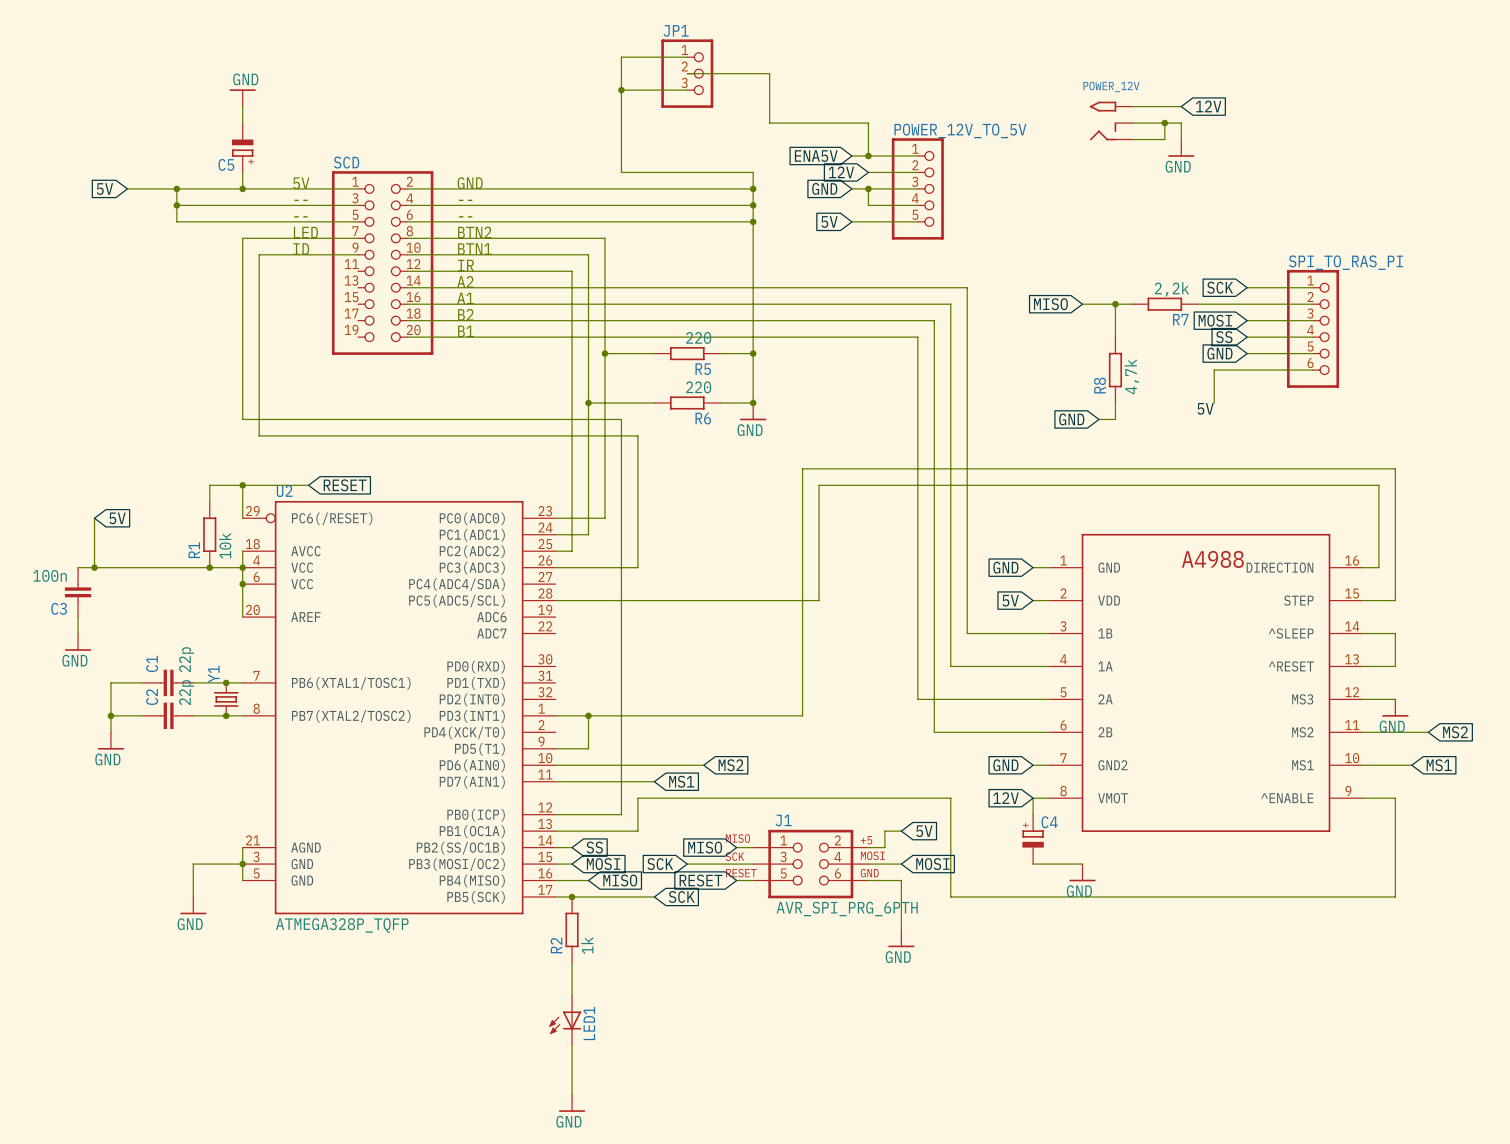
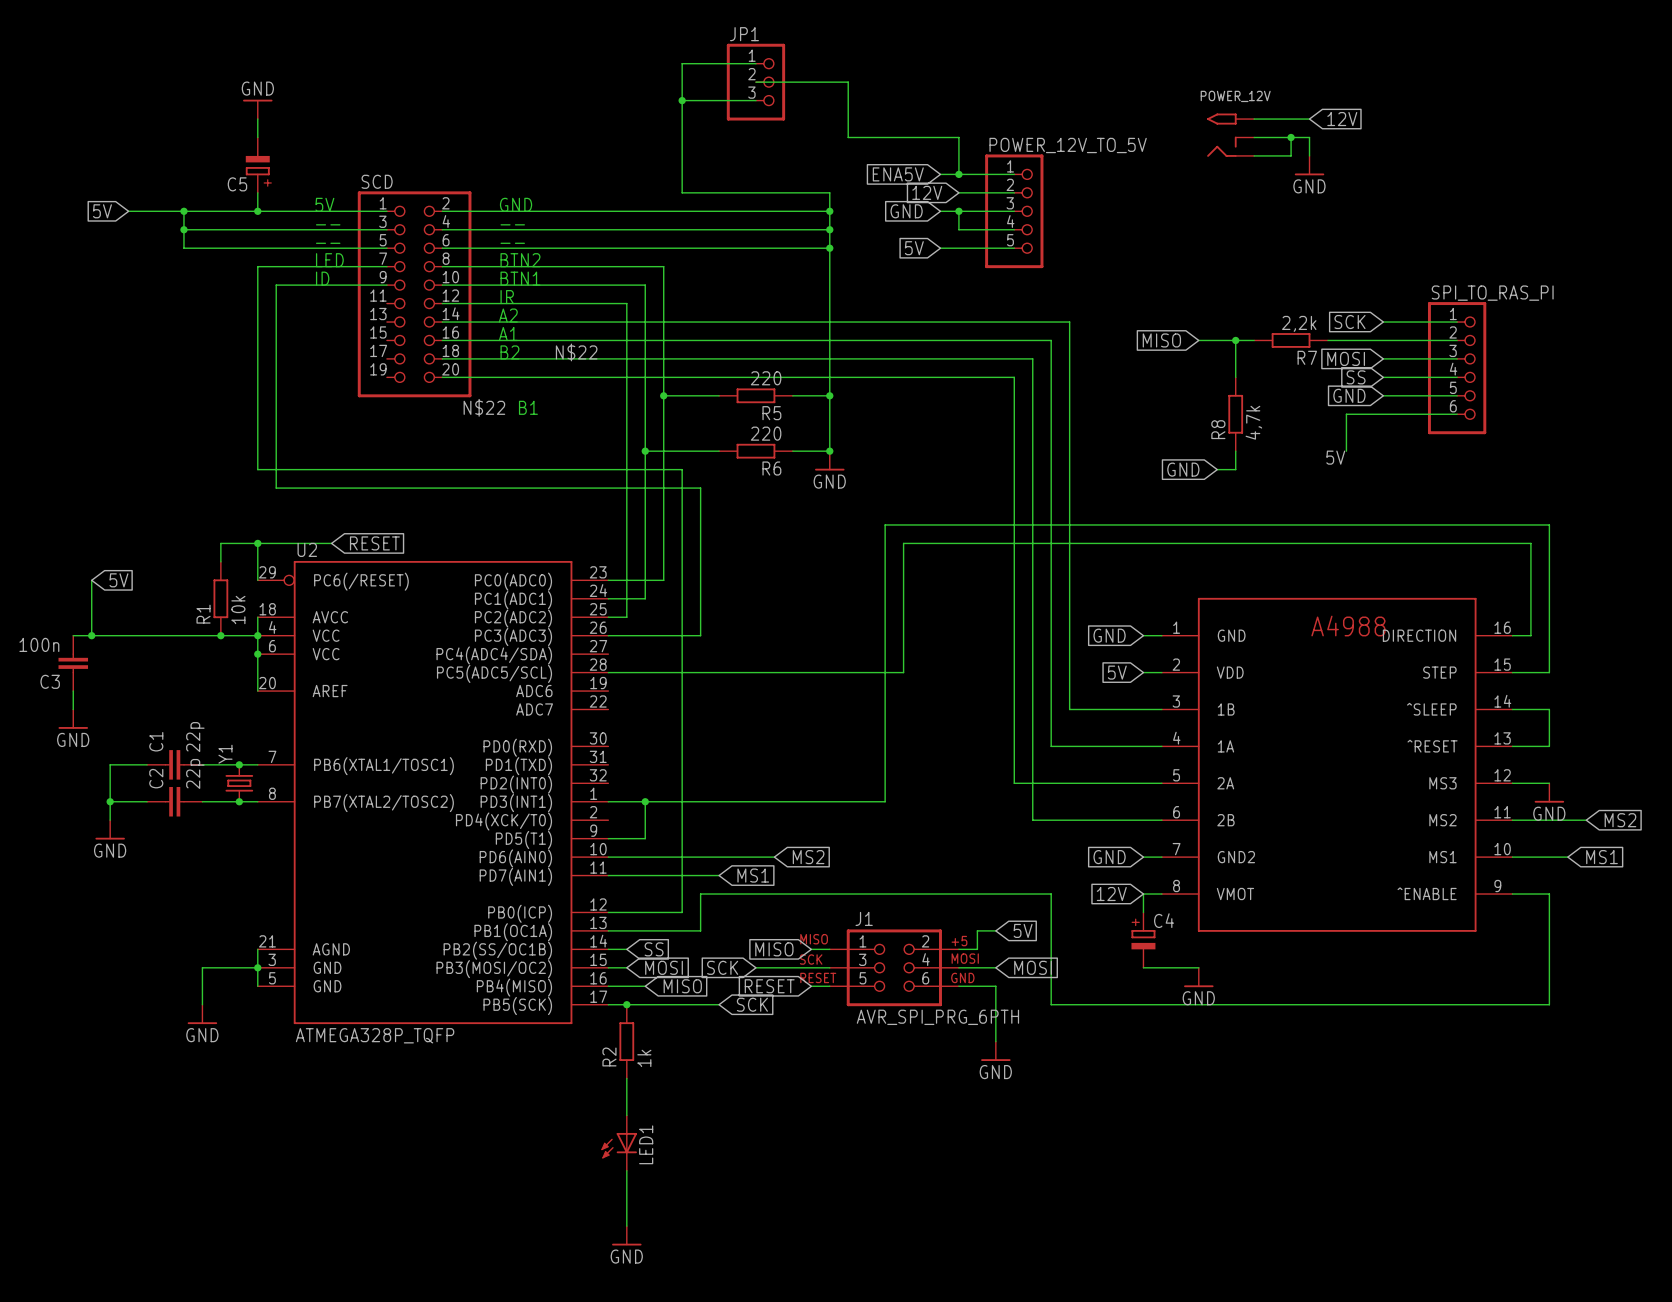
label: none -> N$22 (576, 352)
text position: B1 (465, 331) -> B1 (528, 407)
label: none -> N$22 (484, 407)

